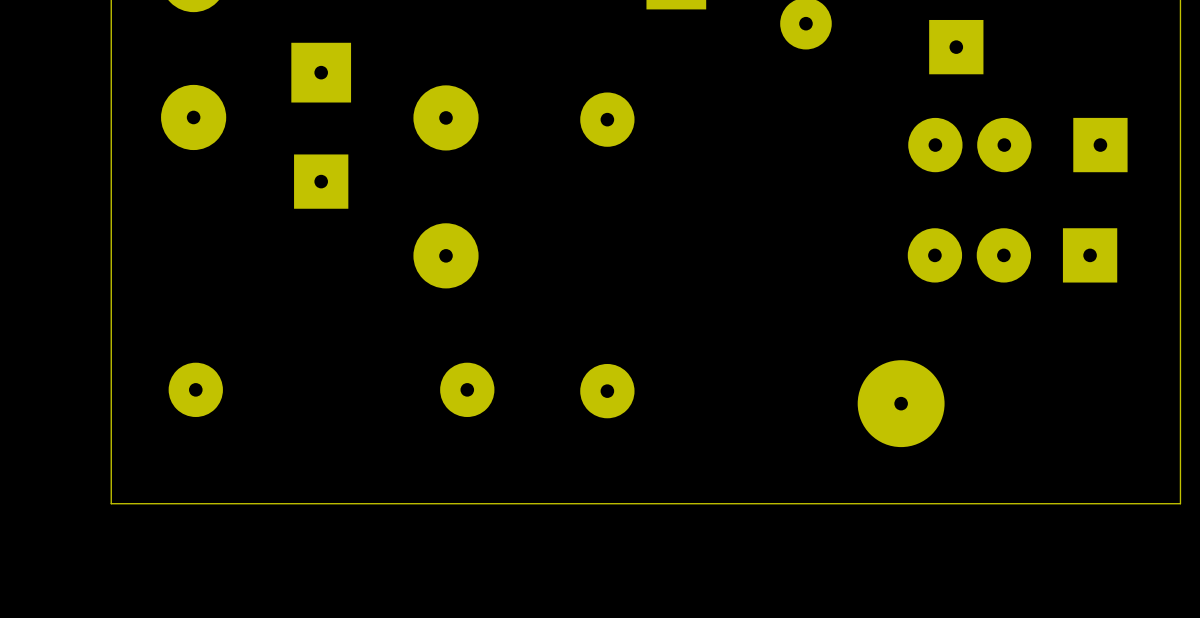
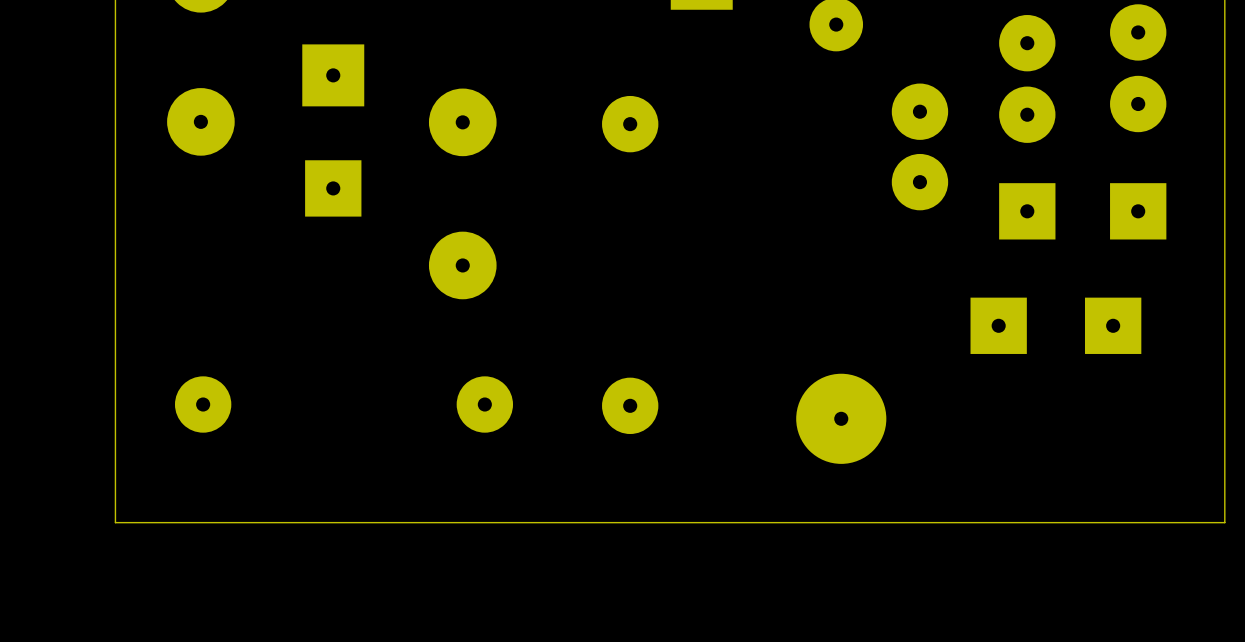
part: (956, 47) -> none
part: none -> (1138, 68)
part: none -> (919, 146)
part rotation: 0° (969, 145) -> 90° clockwise (1027, 78)
part: (1100, 145) -> none
part: none -> (1027, 211)
part: none -> (1138, 211)
part: (969, 255) -> none
part: (1090, 255) -> none
part: none -> (998, 325)
part: none -> (1113, 325)
part position: (901, 403) -> (841, 418)

